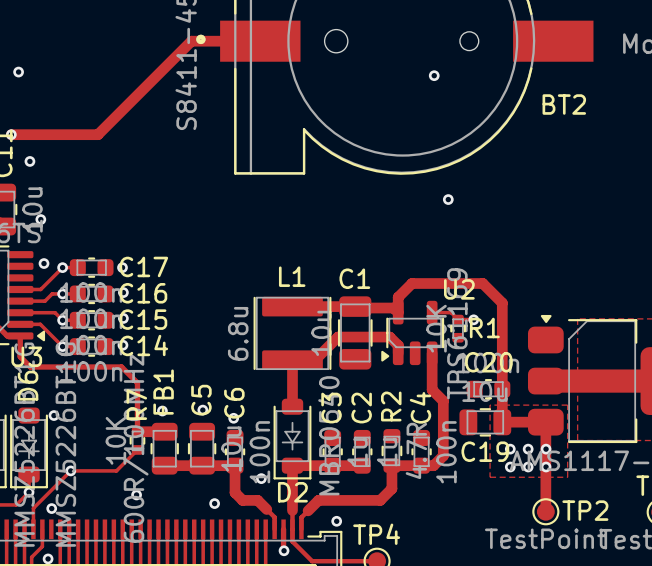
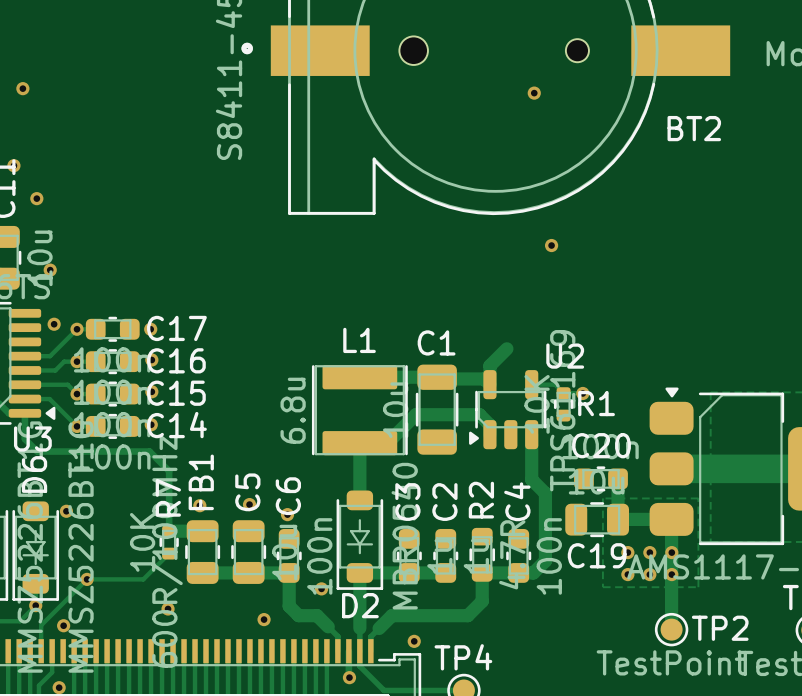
track: (260, 41) (191, 41) (98, 134) (11, 134) -> none
track: (412, 283) (482, 283) (502, 303) (502, 389) -> none

